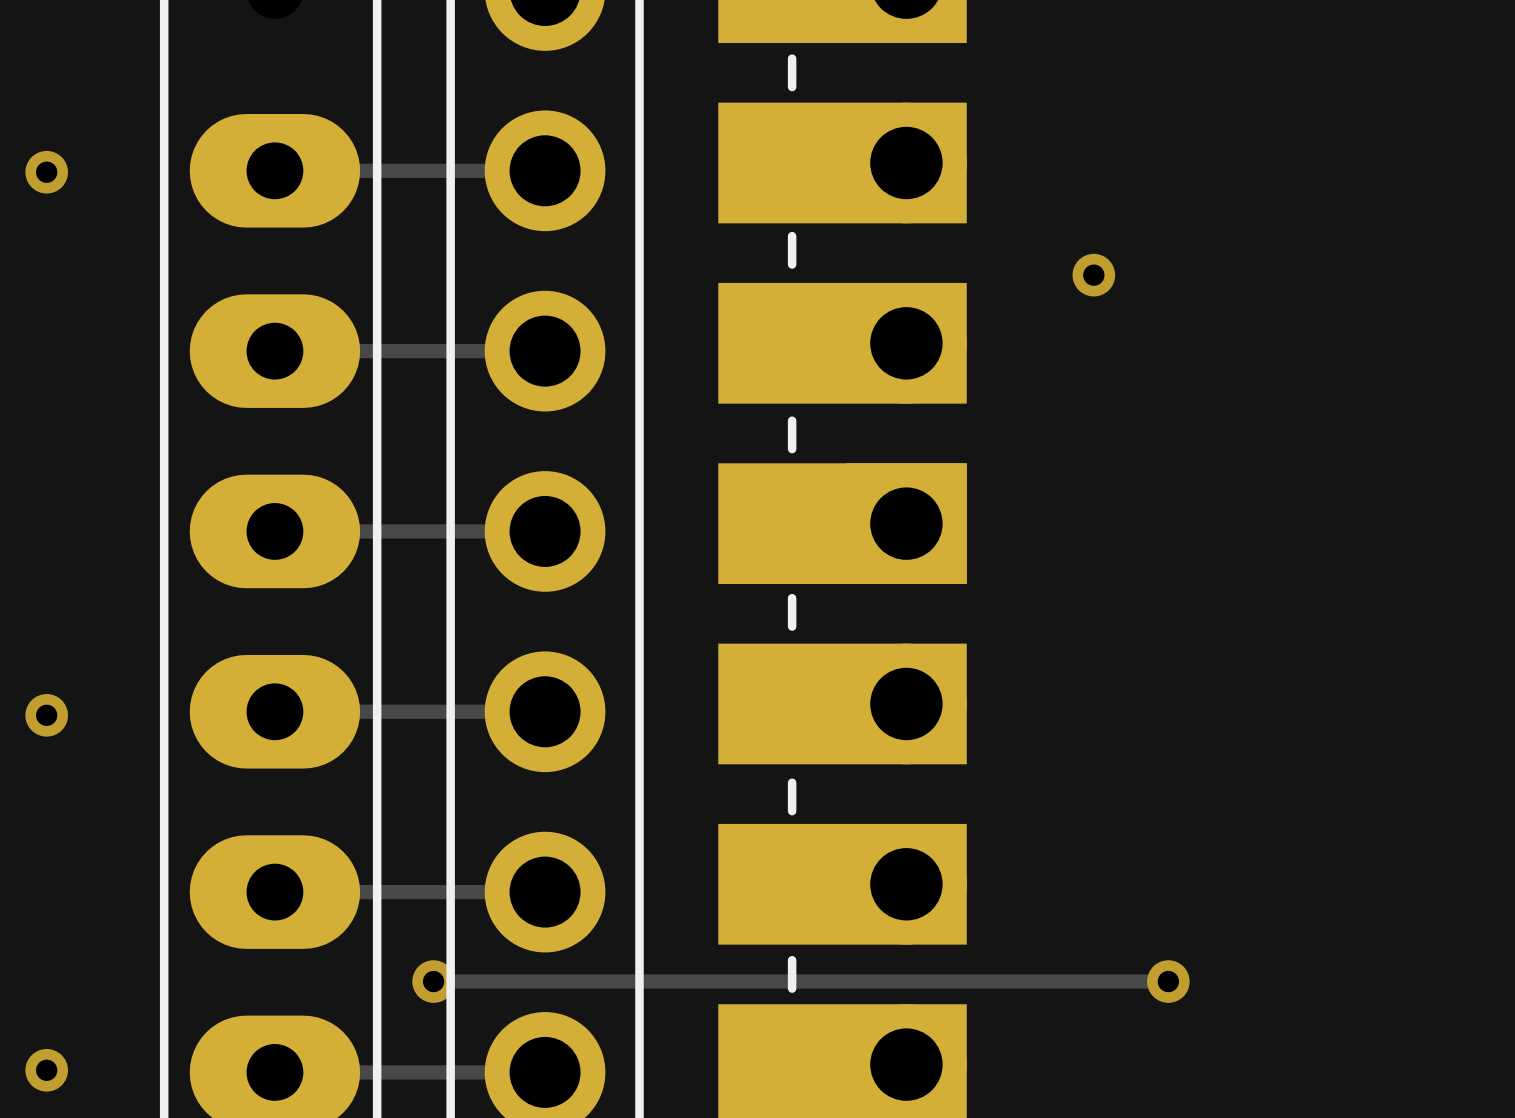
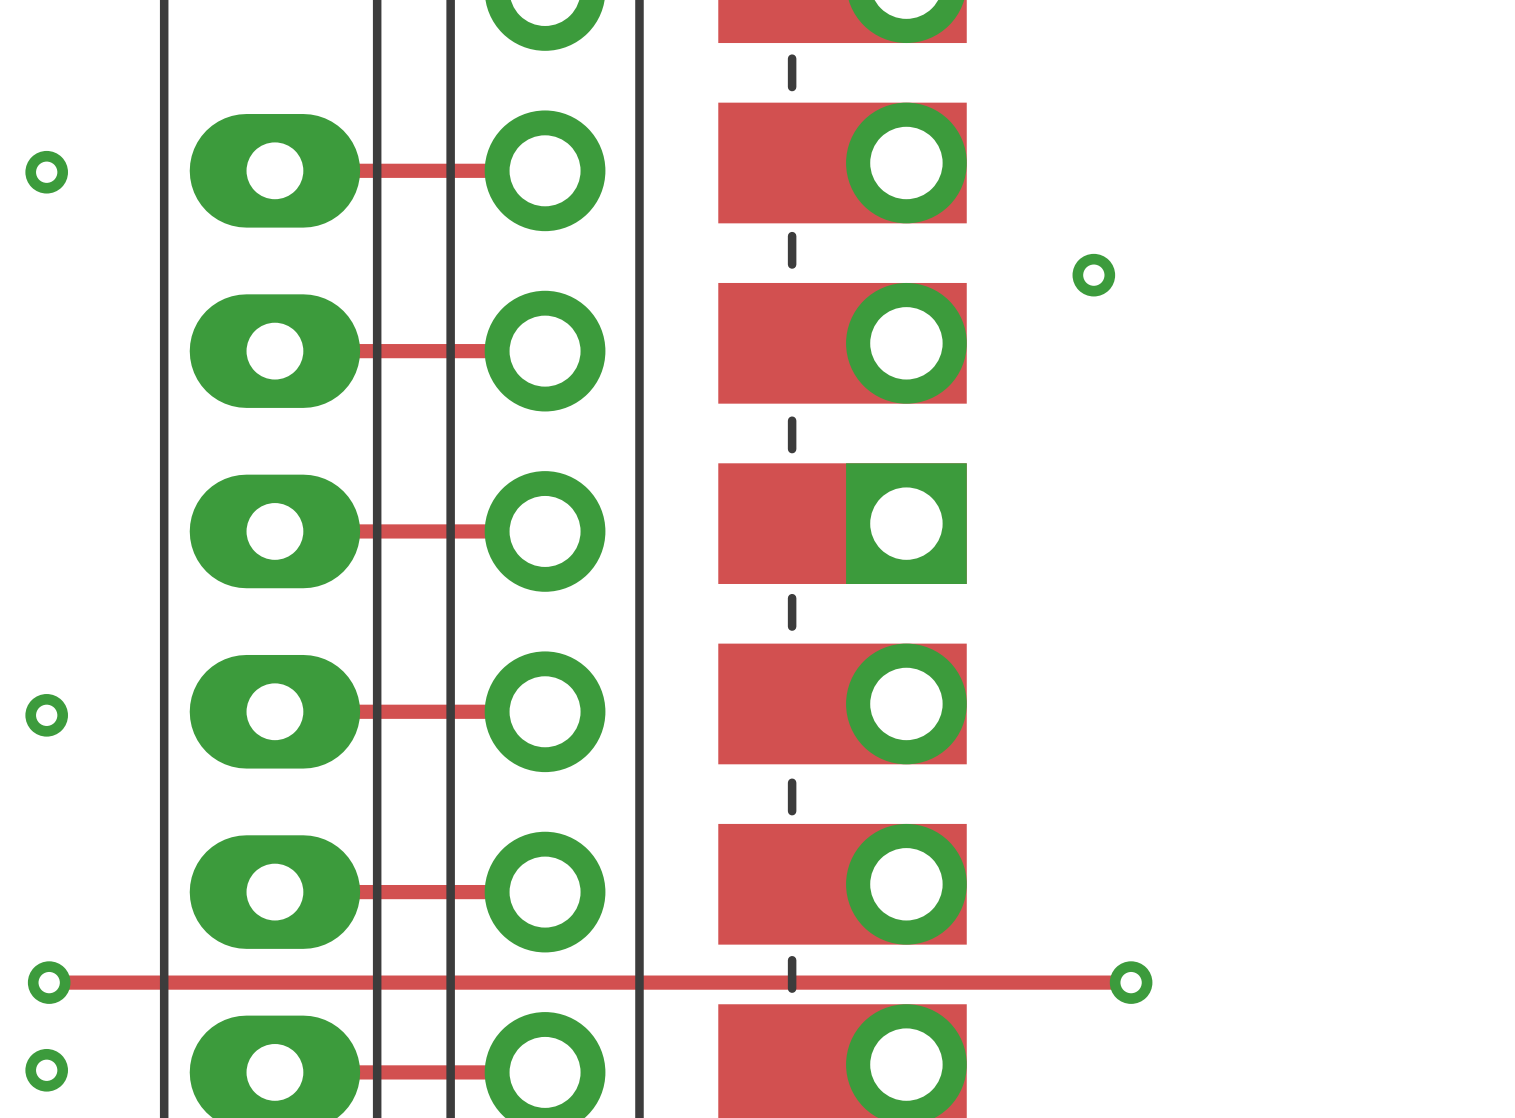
track: (433, 981) (1168, 981) -> none
via: (433, 981) -> none
via position: (1168, 981) -> (1131, 982)
track: none -> (49, 982) (1131, 982)
via: none -> (49, 982)

